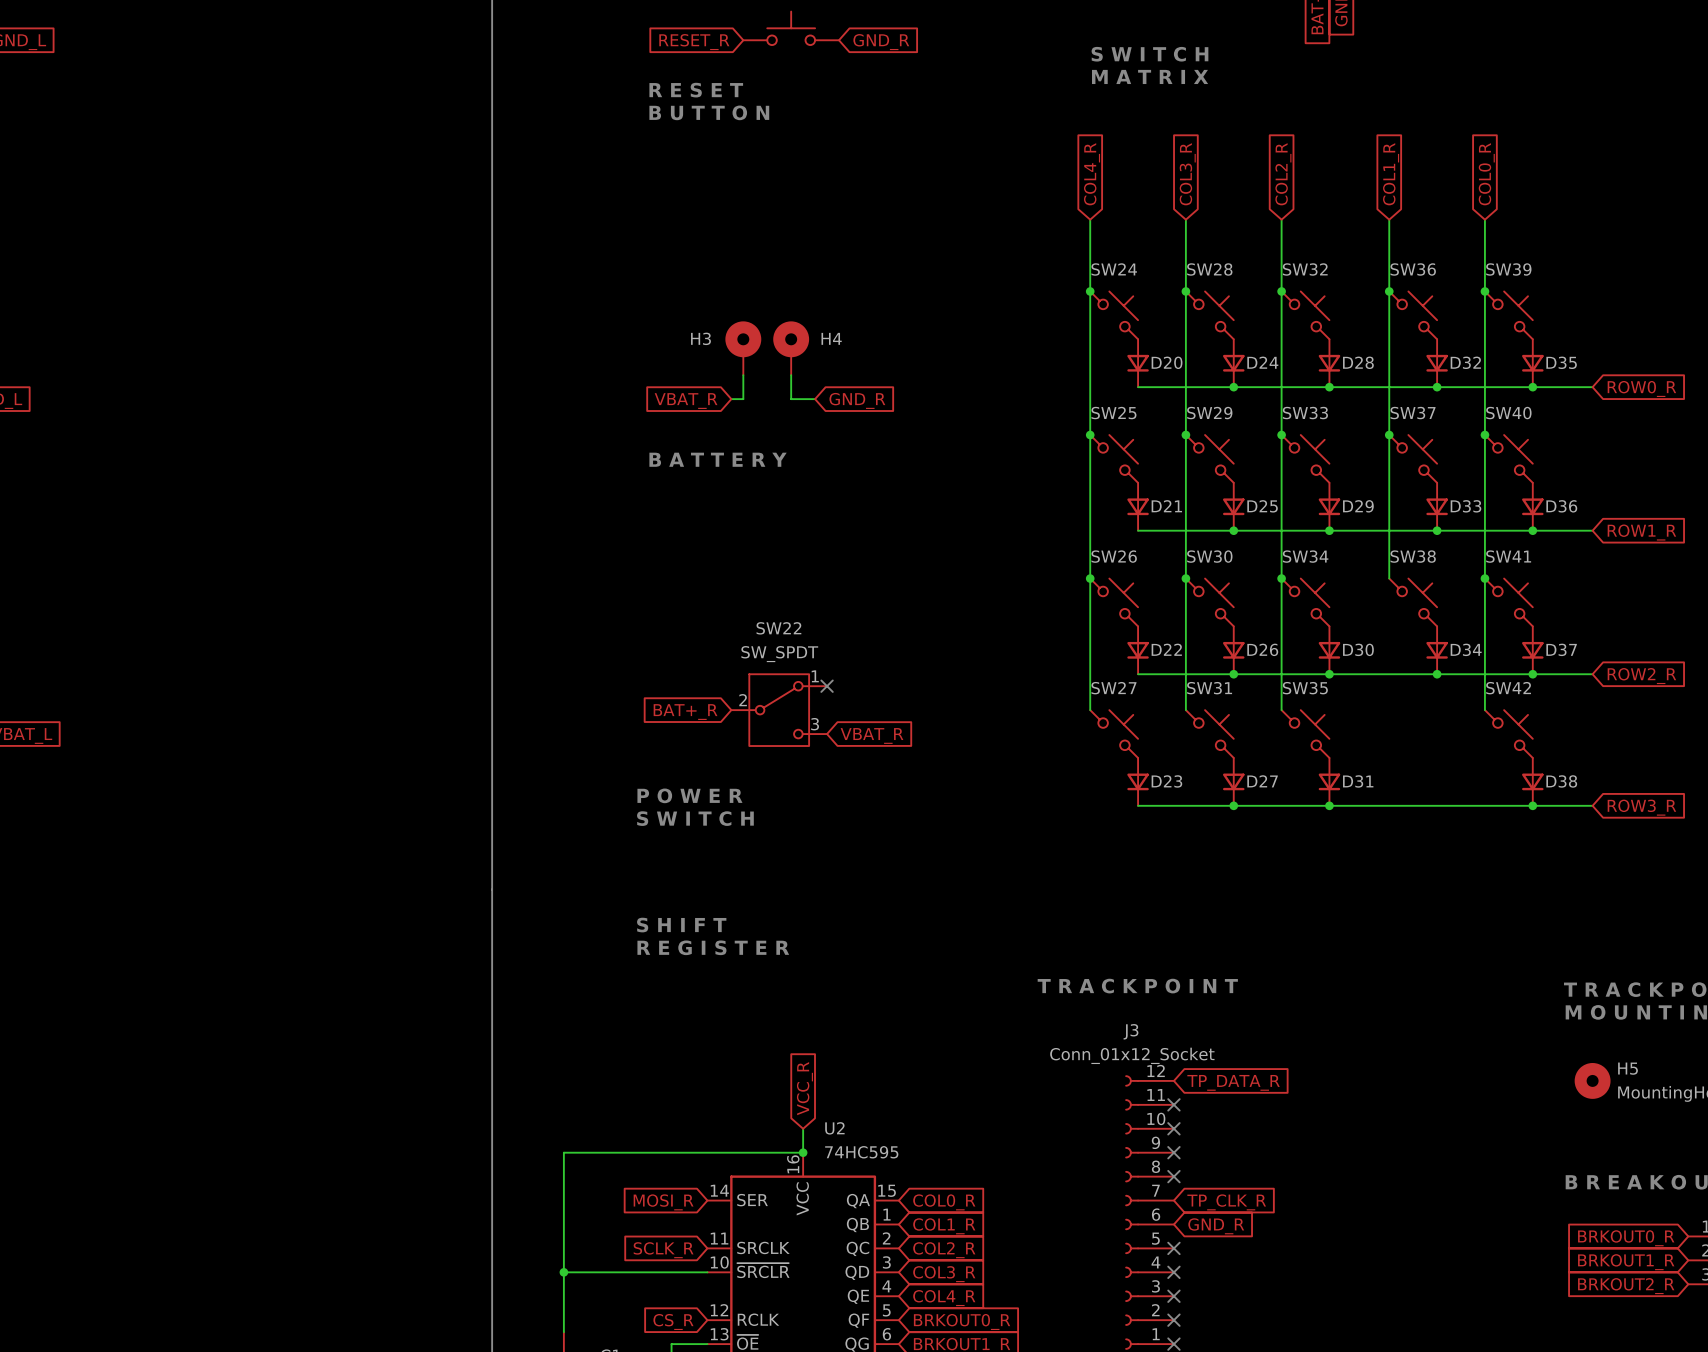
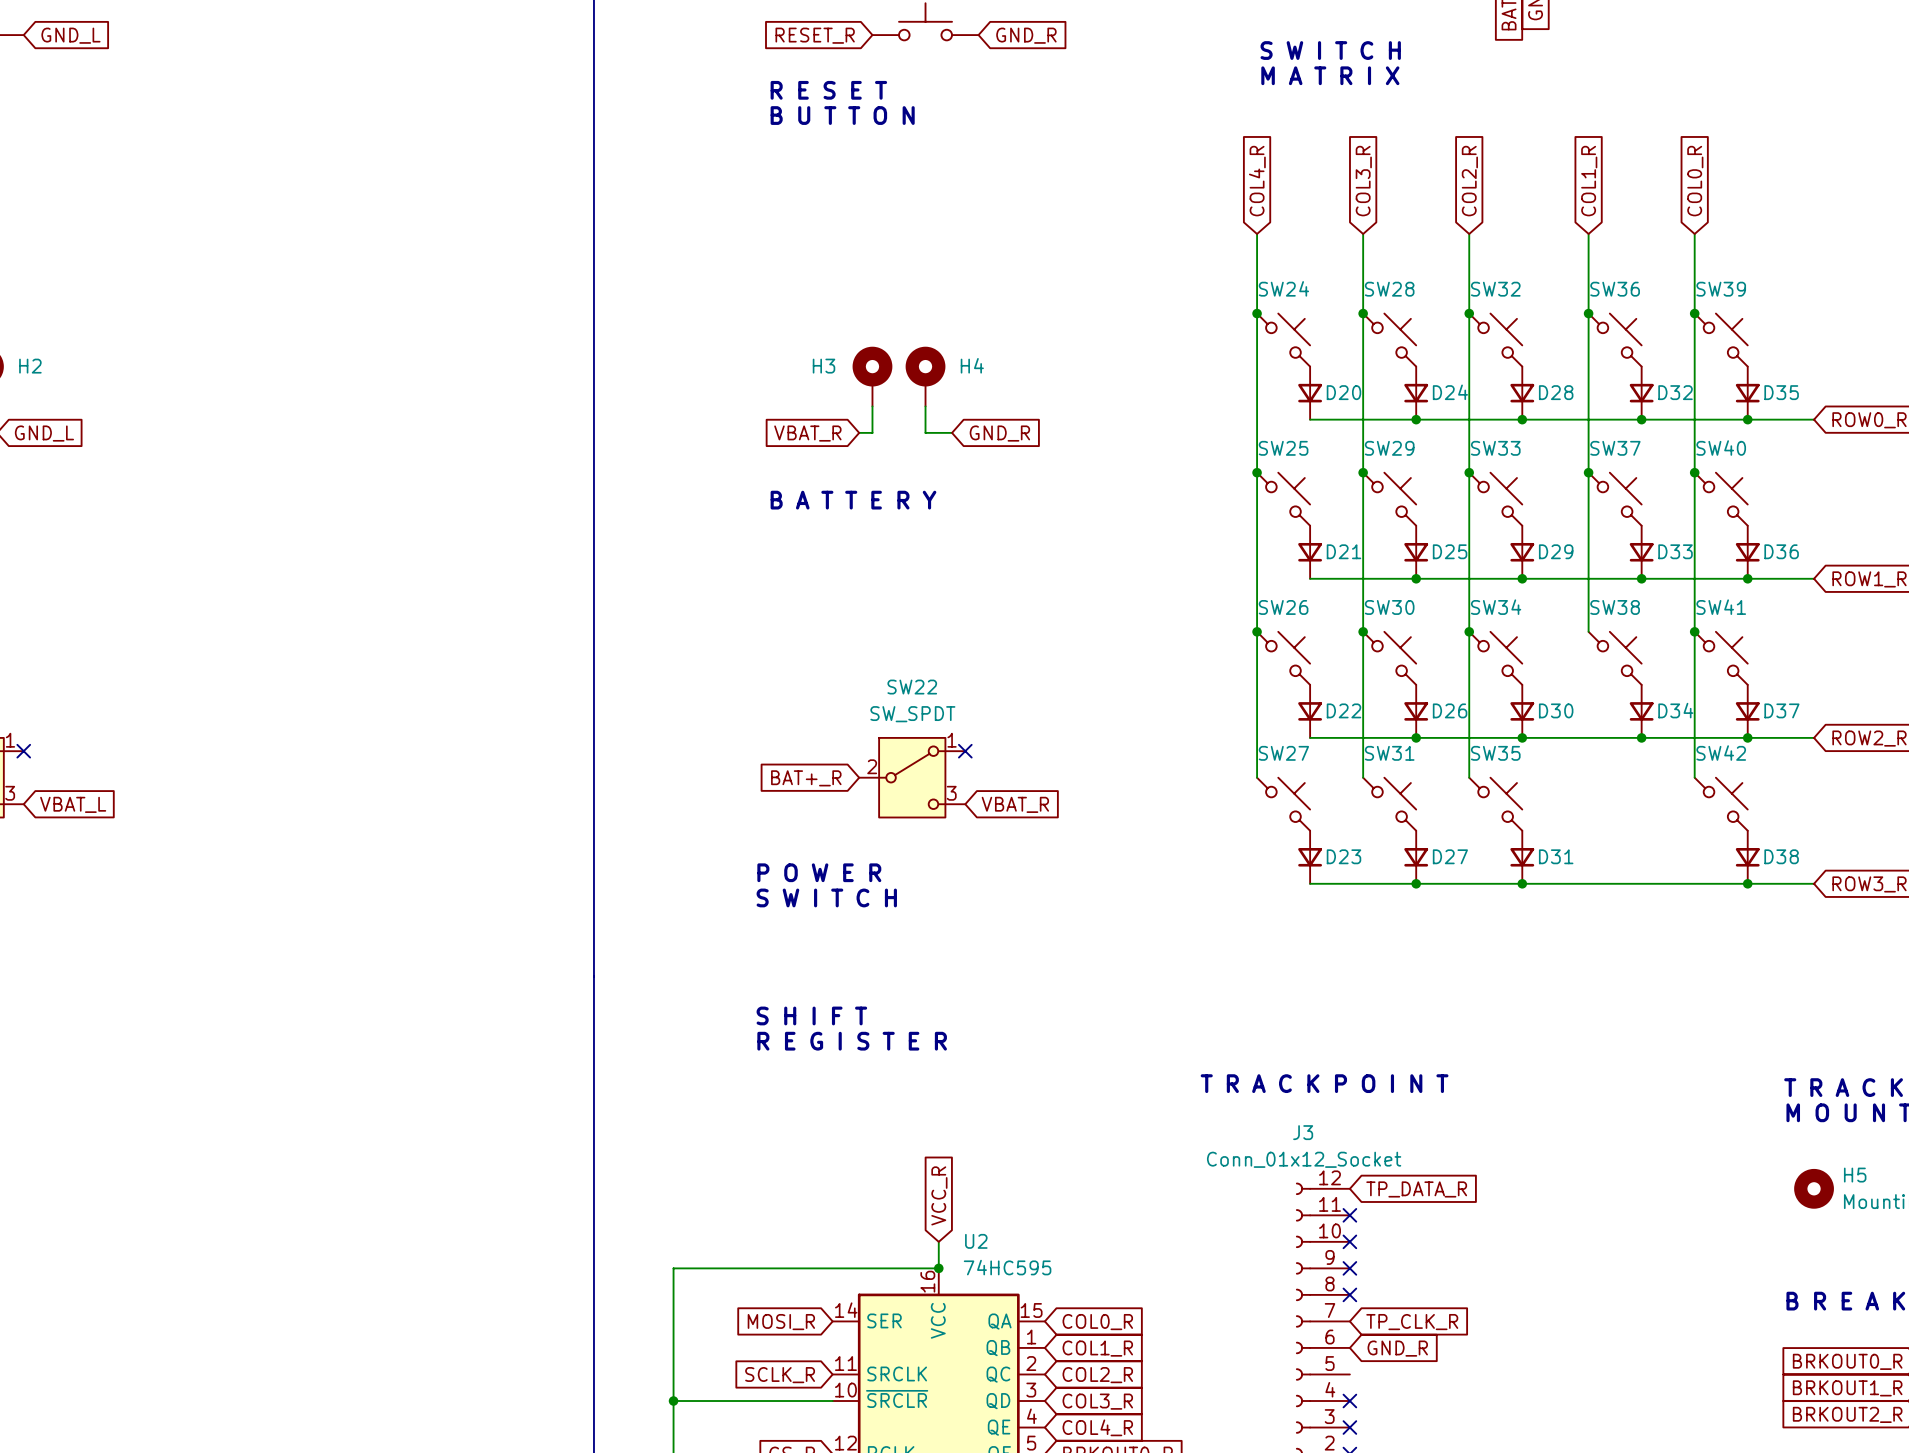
no-connect mark: (1173, 1248) -> none

